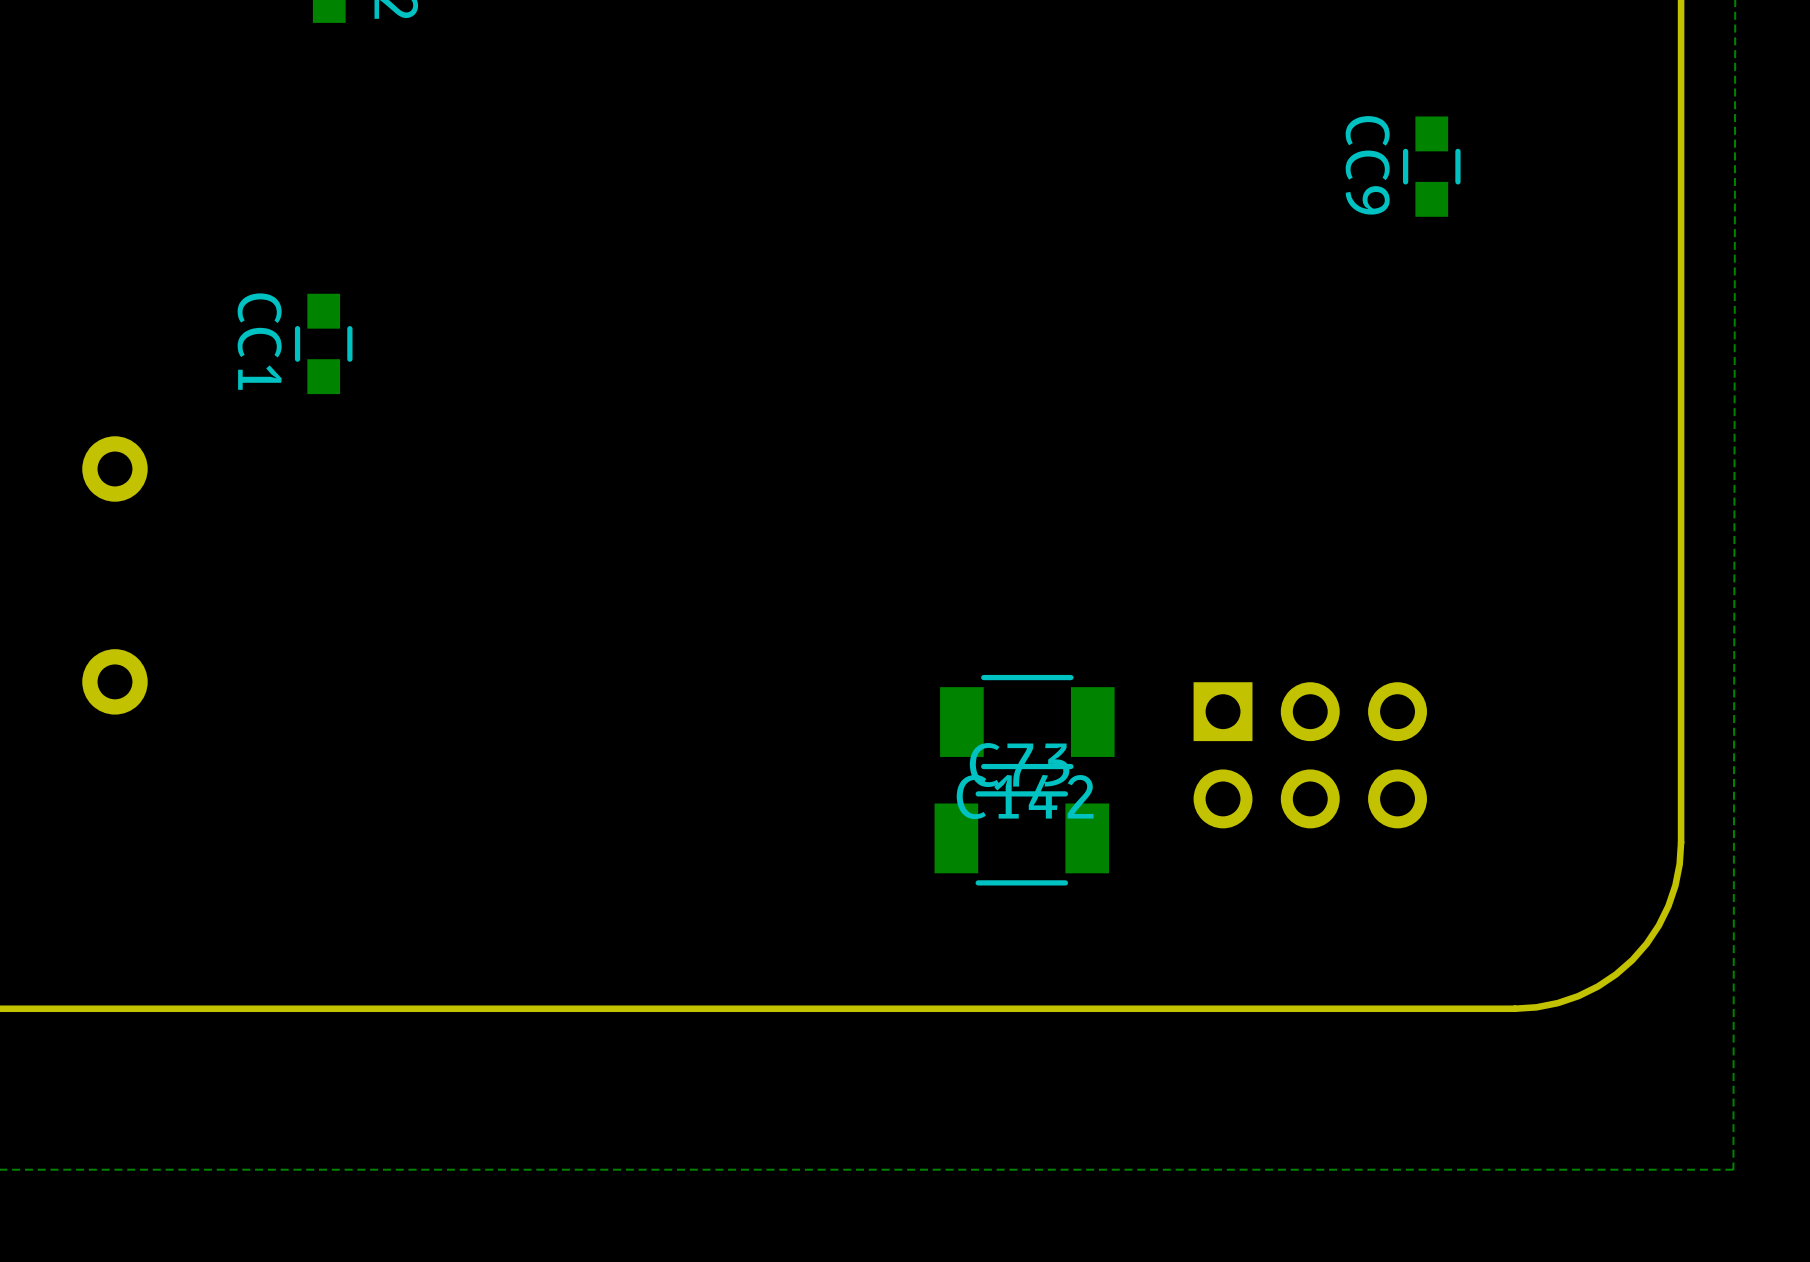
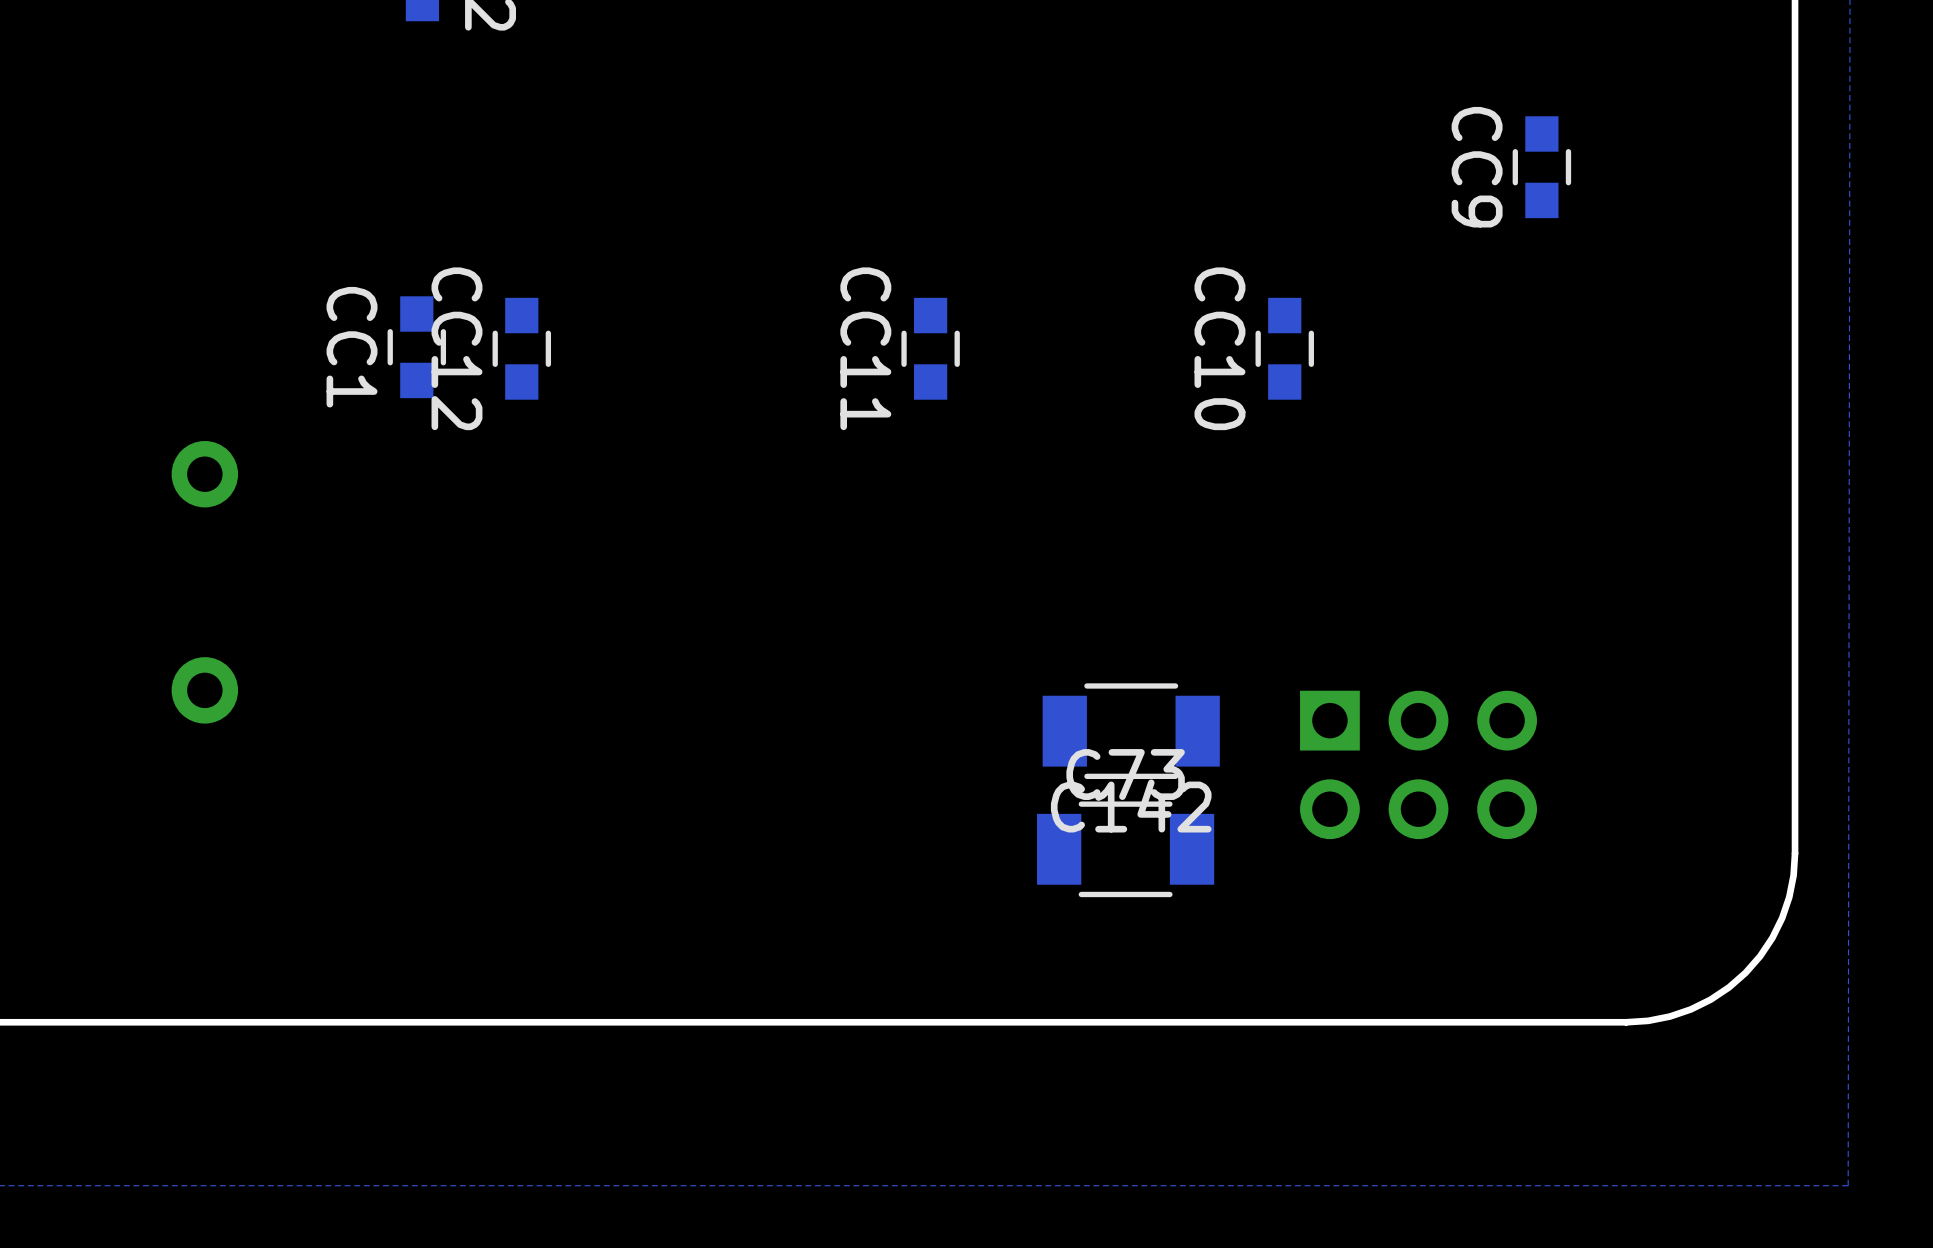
CC12: none -> (521, 348)
CC11: none -> (930, 348)
CC10: none -> (1284, 348)

